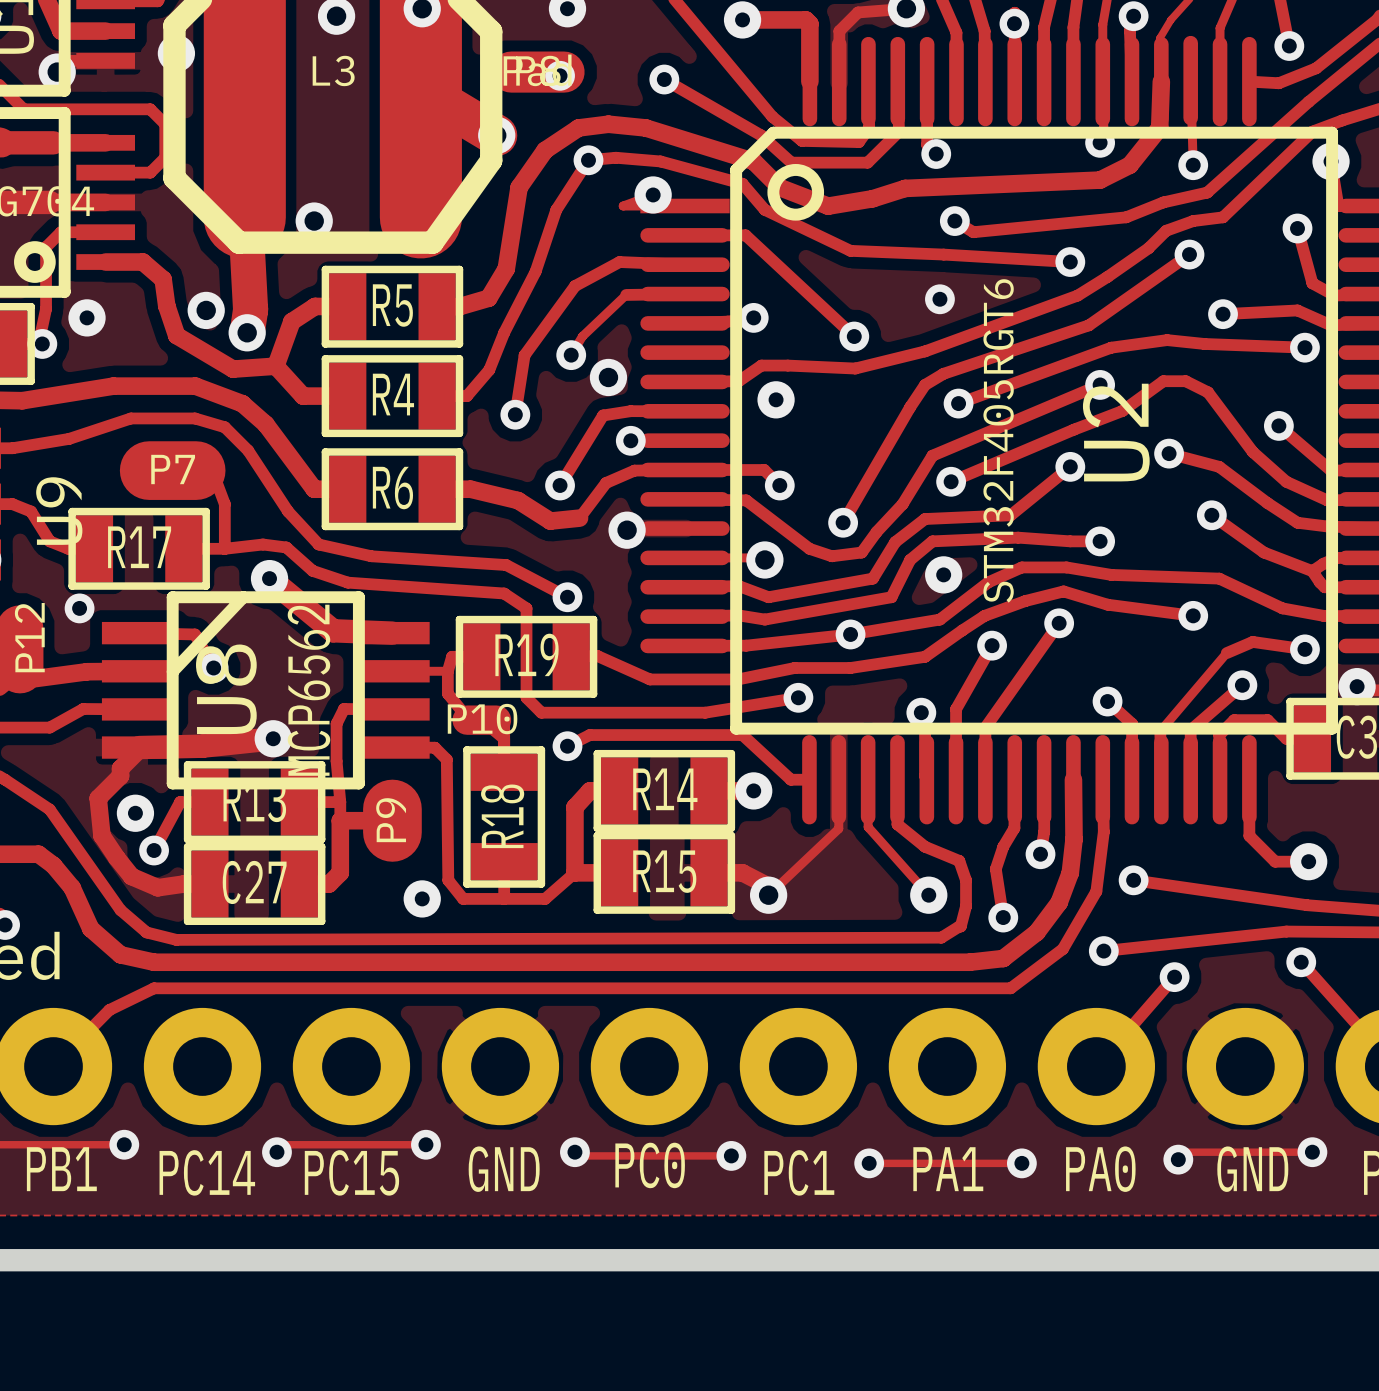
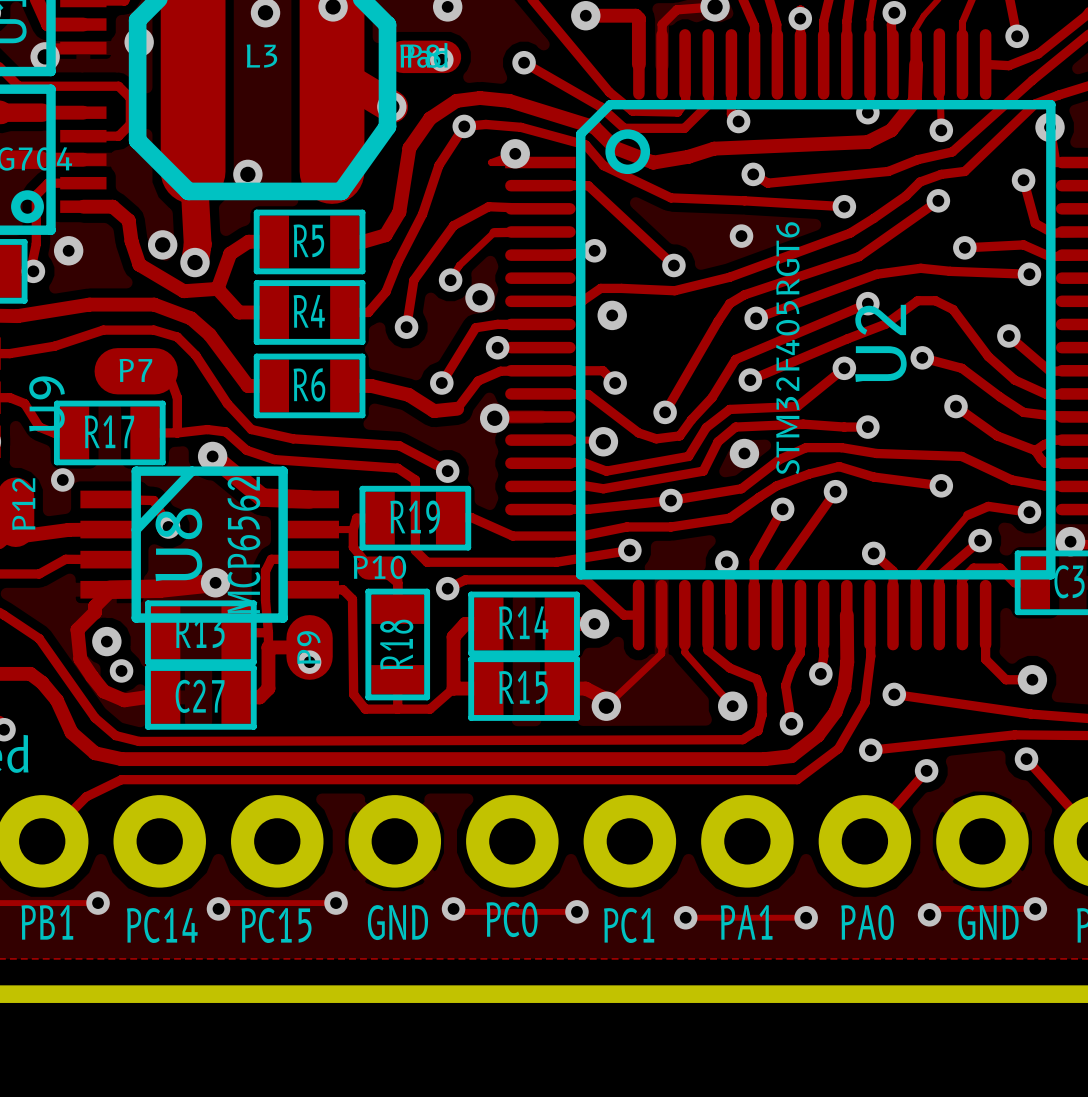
track: (209, 802) (180, 802) (154, 850) -> none
via: none -> (309, 662)
via: (422, 898) -> none

